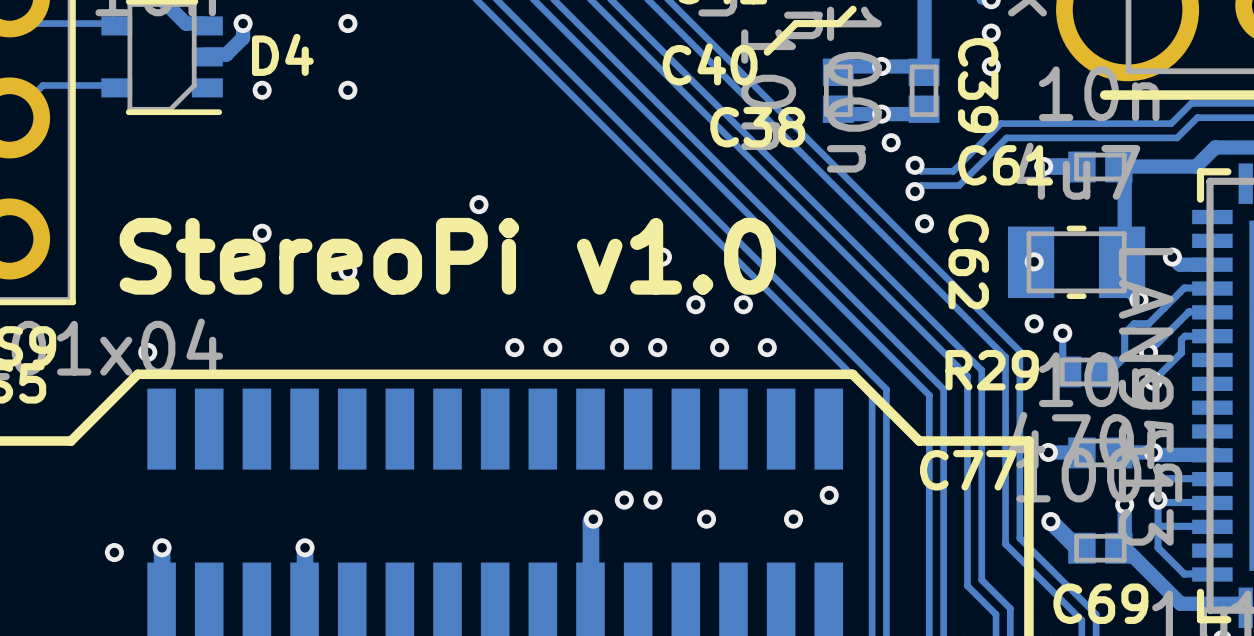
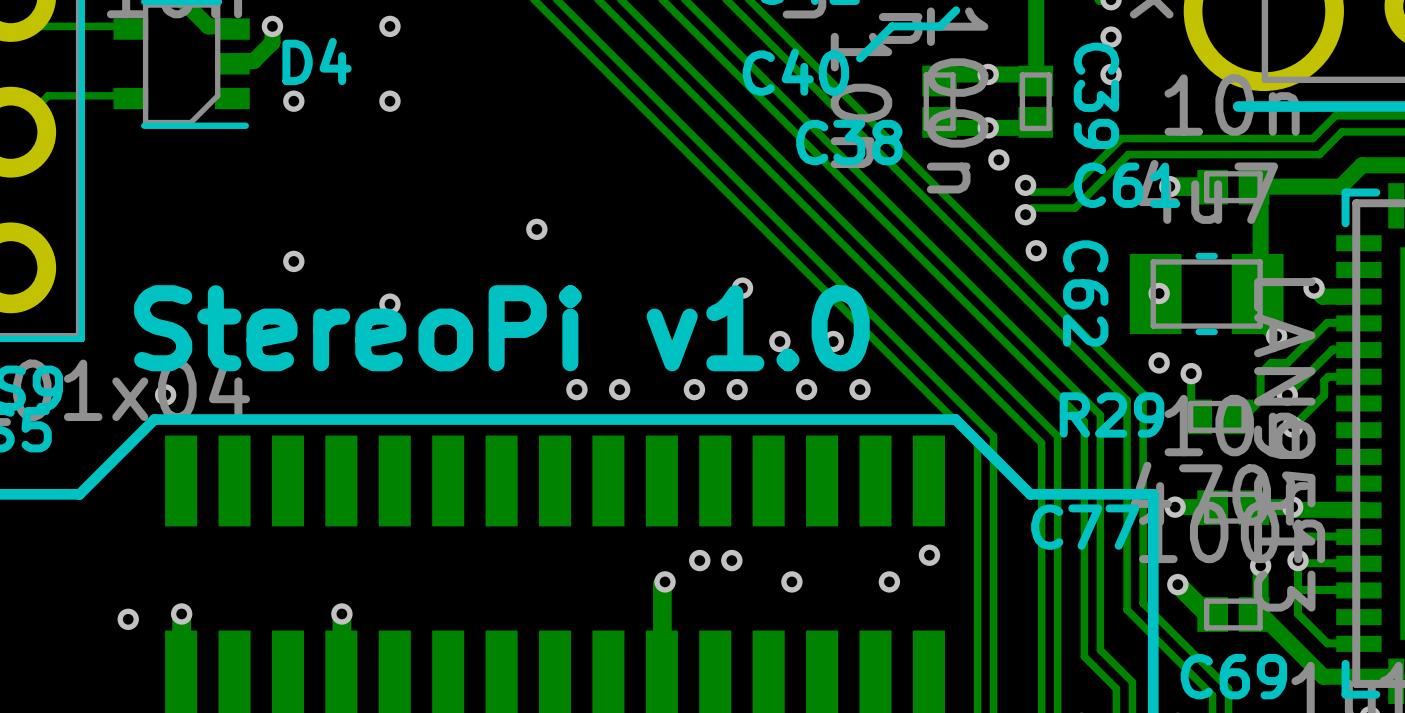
text position: StereoPi v1.0 (447, 256) -> StereoPi v1.0 (501, 328)

